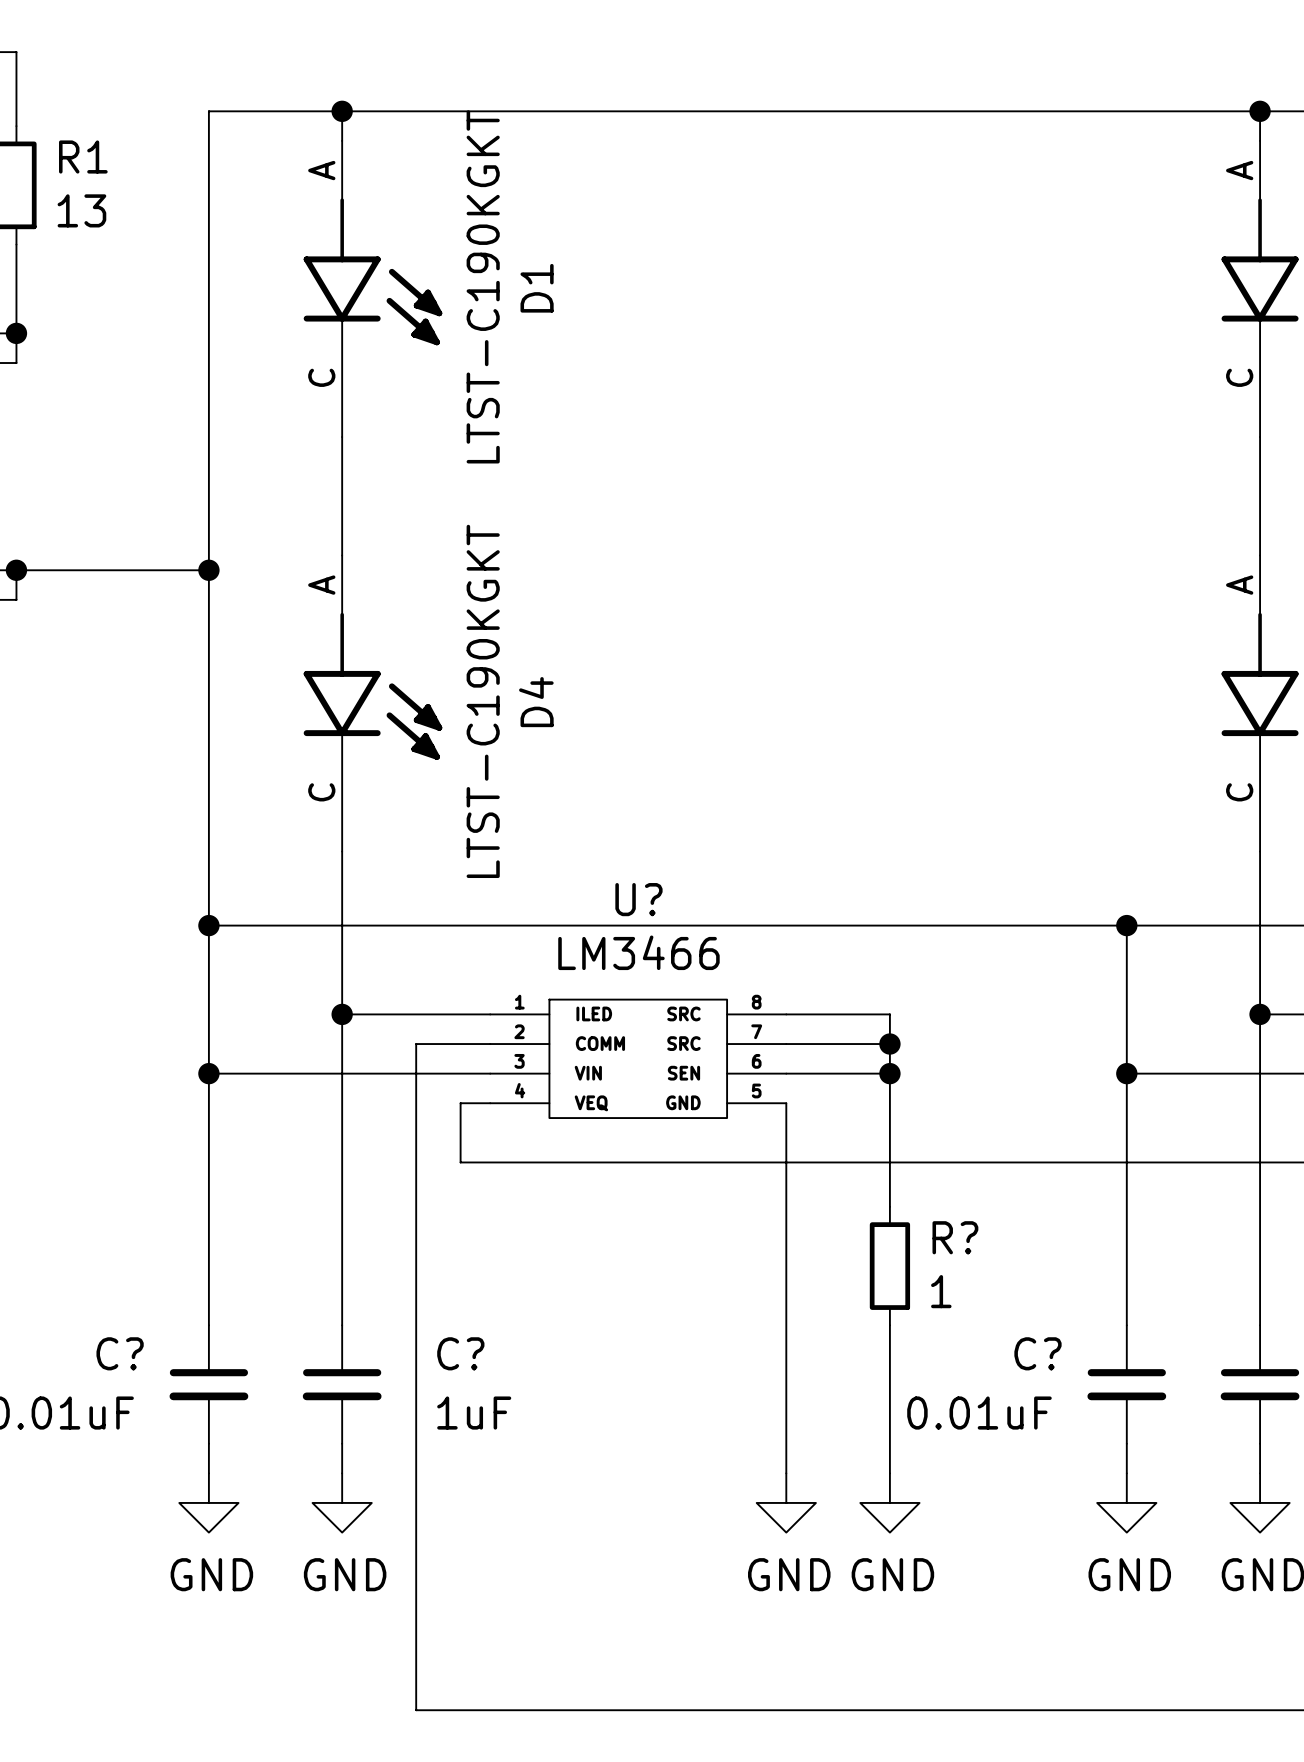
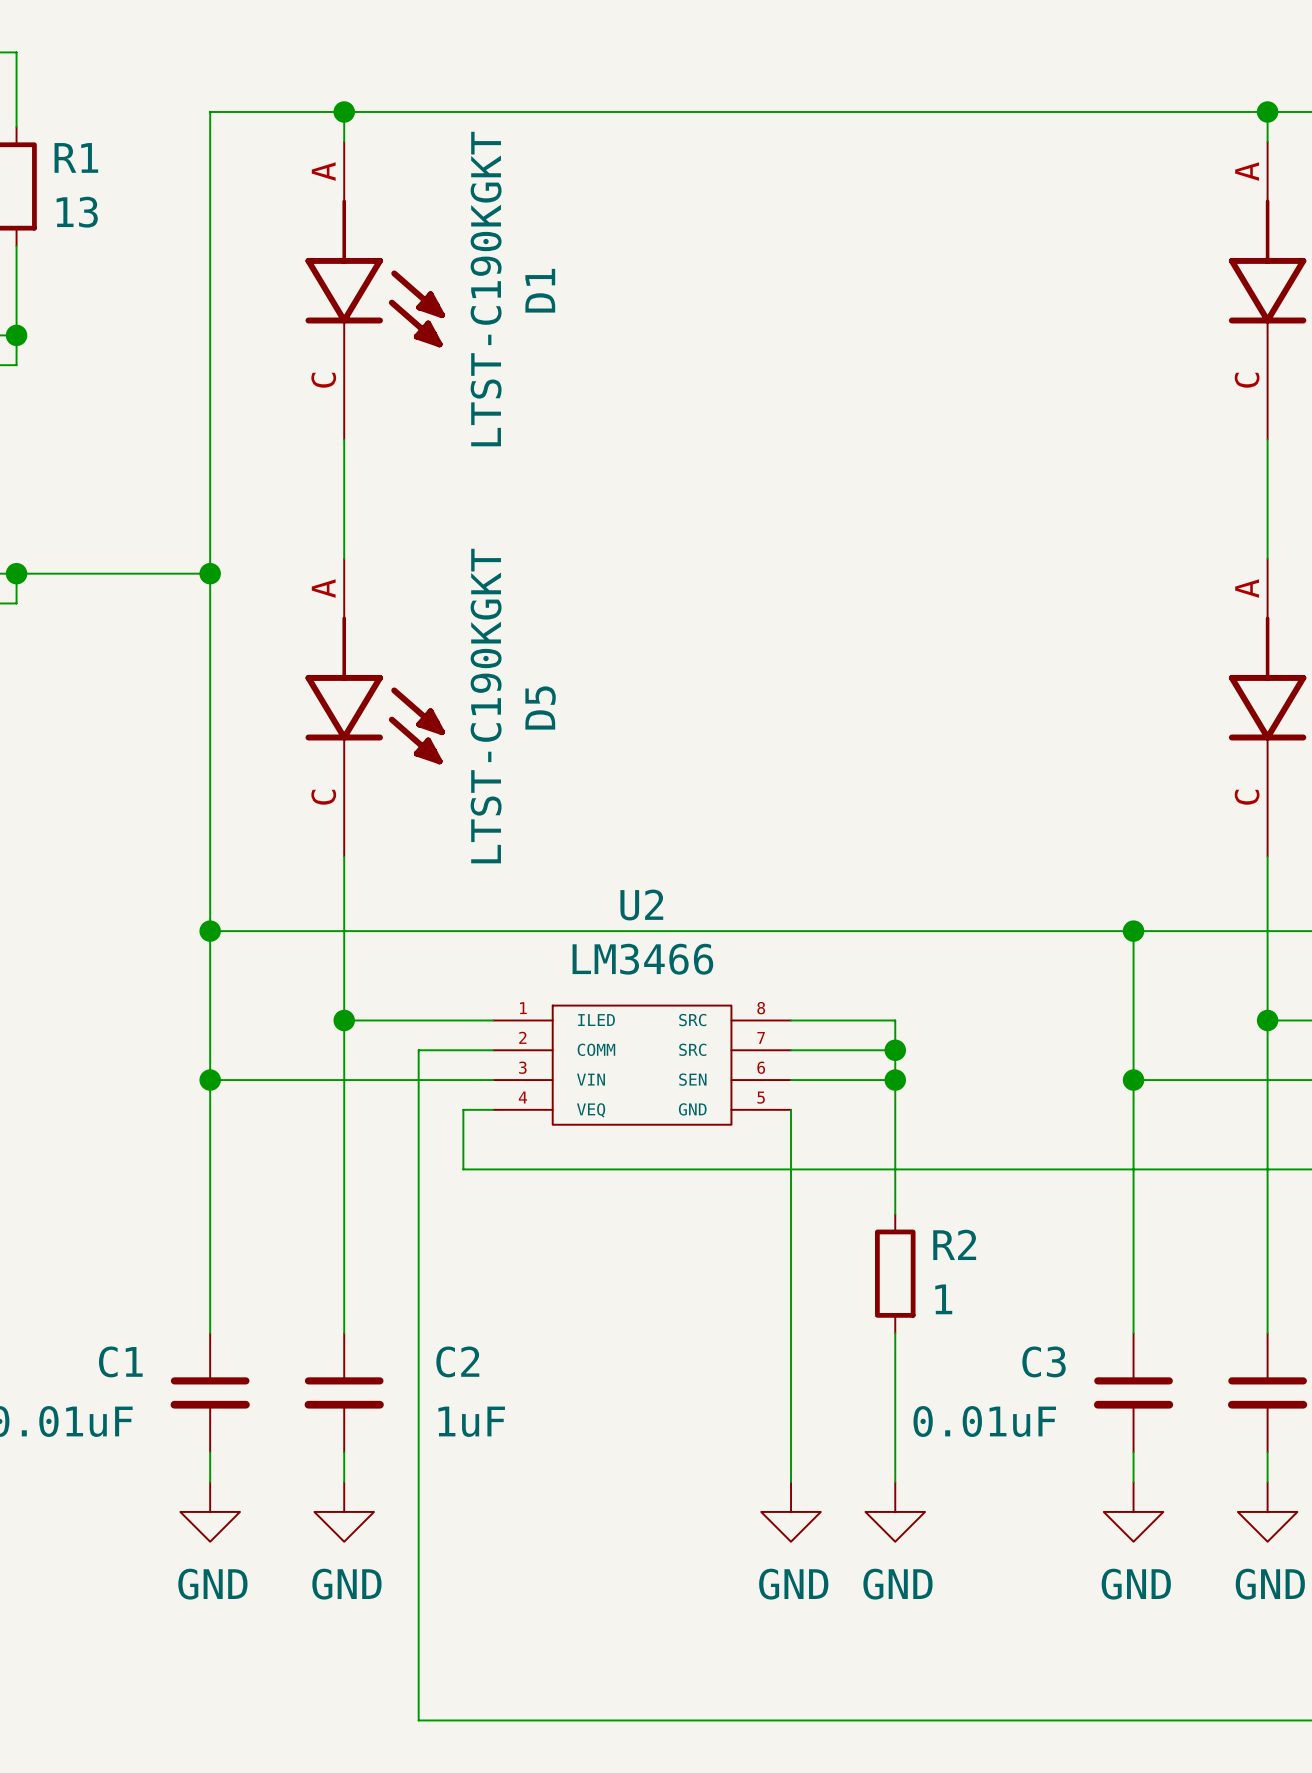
D4 name: D4 (536, 702) -> D5 (540, 707)
U? name: U? (638, 899) -> U2 (641, 905)
R? name: R? (955, 1237) -> R2 (954, 1244)
C? name: C? (120, 1353) -> C1 (120, 1361)
C? name: C? (460, 1353) -> C2 (457, 1361)
C? name: C? (1037, 1353) -> C3 (1044, 1361)

